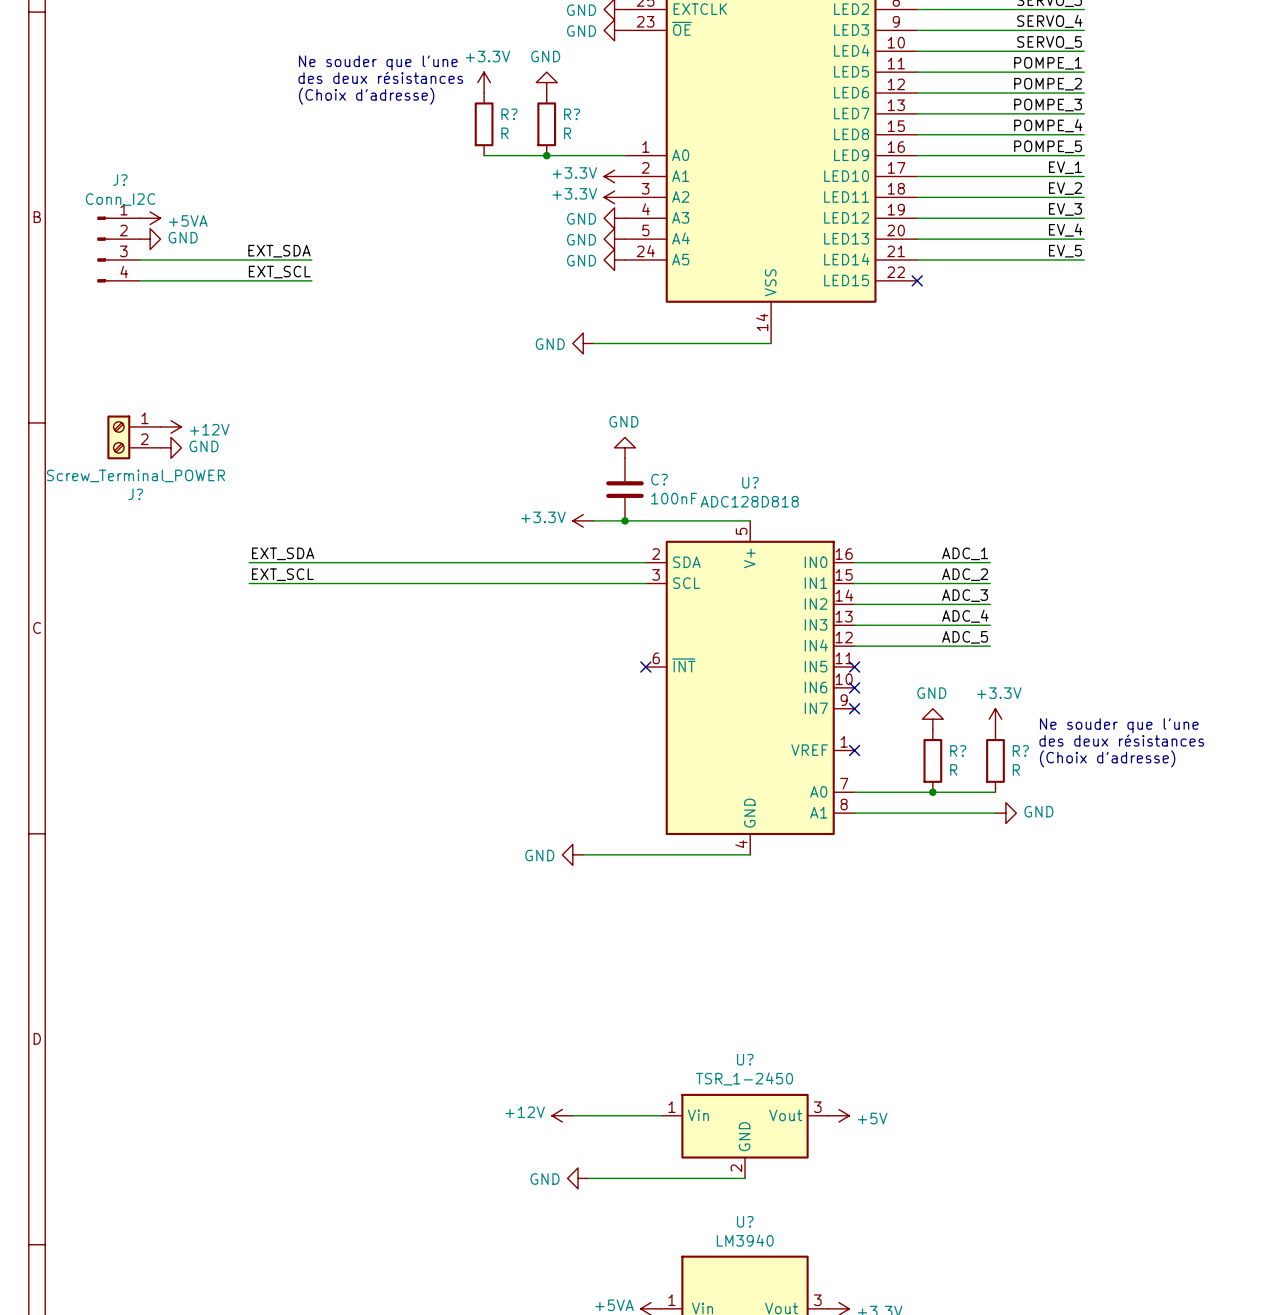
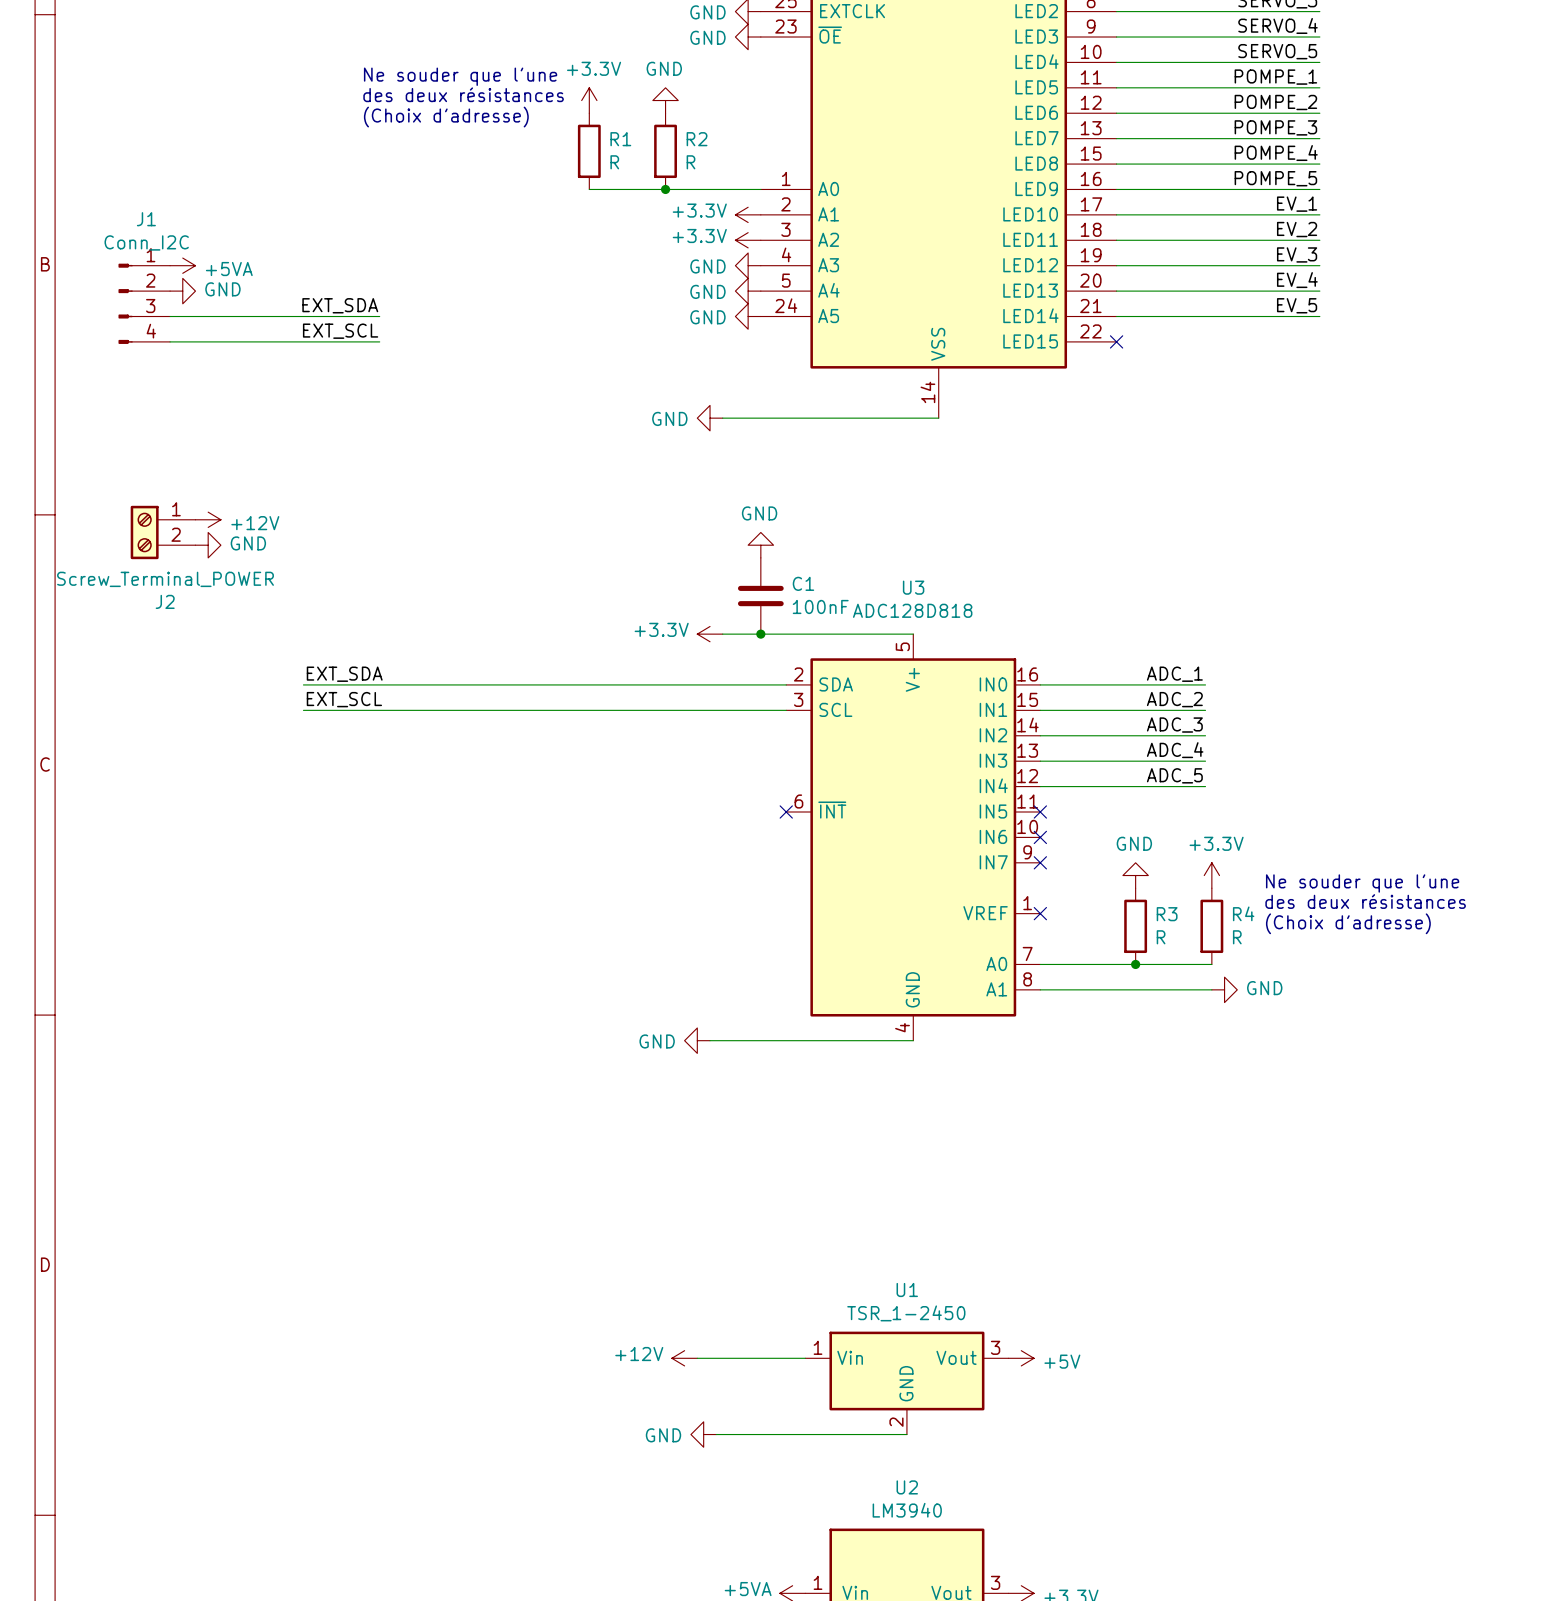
R? name: R? (509, 114) -> R1 (620, 139)
R? name: R? (572, 114) -> R2 (697, 139)
J? name: J? (120, 180) -> J1 (146, 219)
C? name: C? (659, 479) -> C1 (803, 583)
U? name: U? (750, 482) -> U3 (913, 587)
J? name: J? (135, 494) -> J2 (165, 601)
R? name: R? (958, 750) -> R3 (1167, 914)
R? name: R? (1020, 750) -> R4 (1243, 913)
U? name: U? (745, 1059) -> U1 (907, 1289)
U? name: U? (745, 1221) -> U2 (907, 1487)

